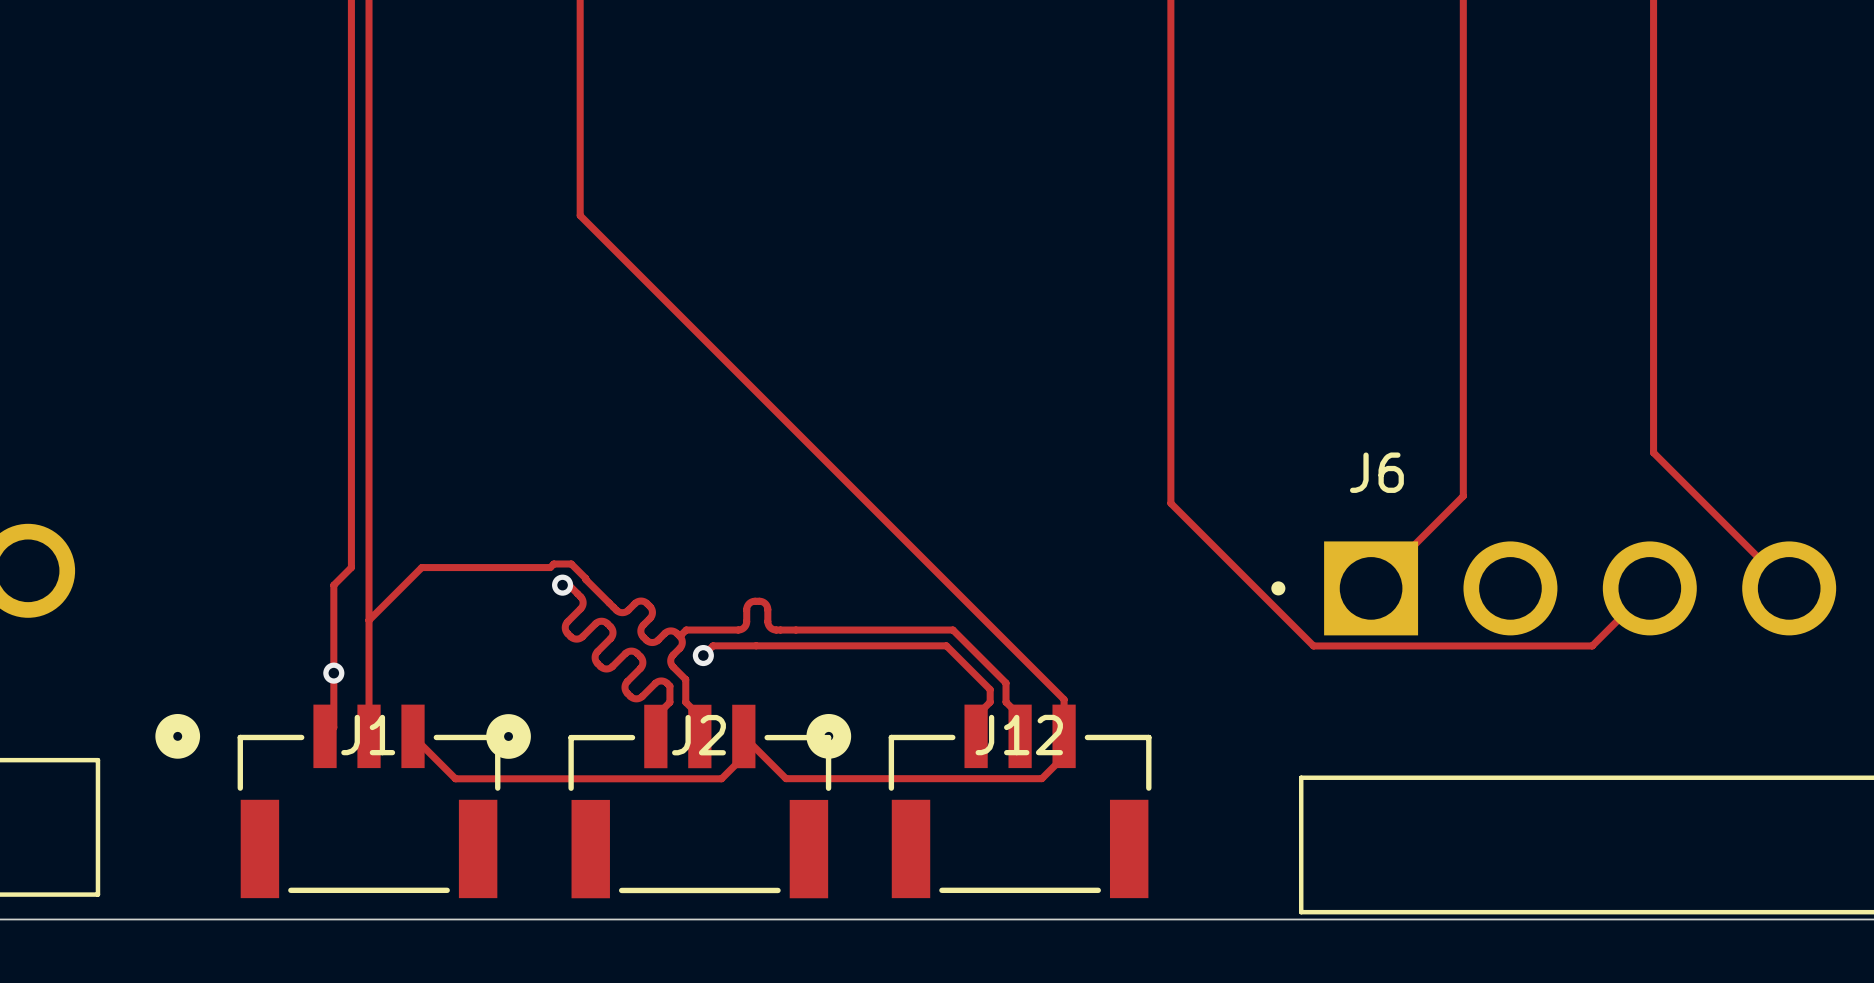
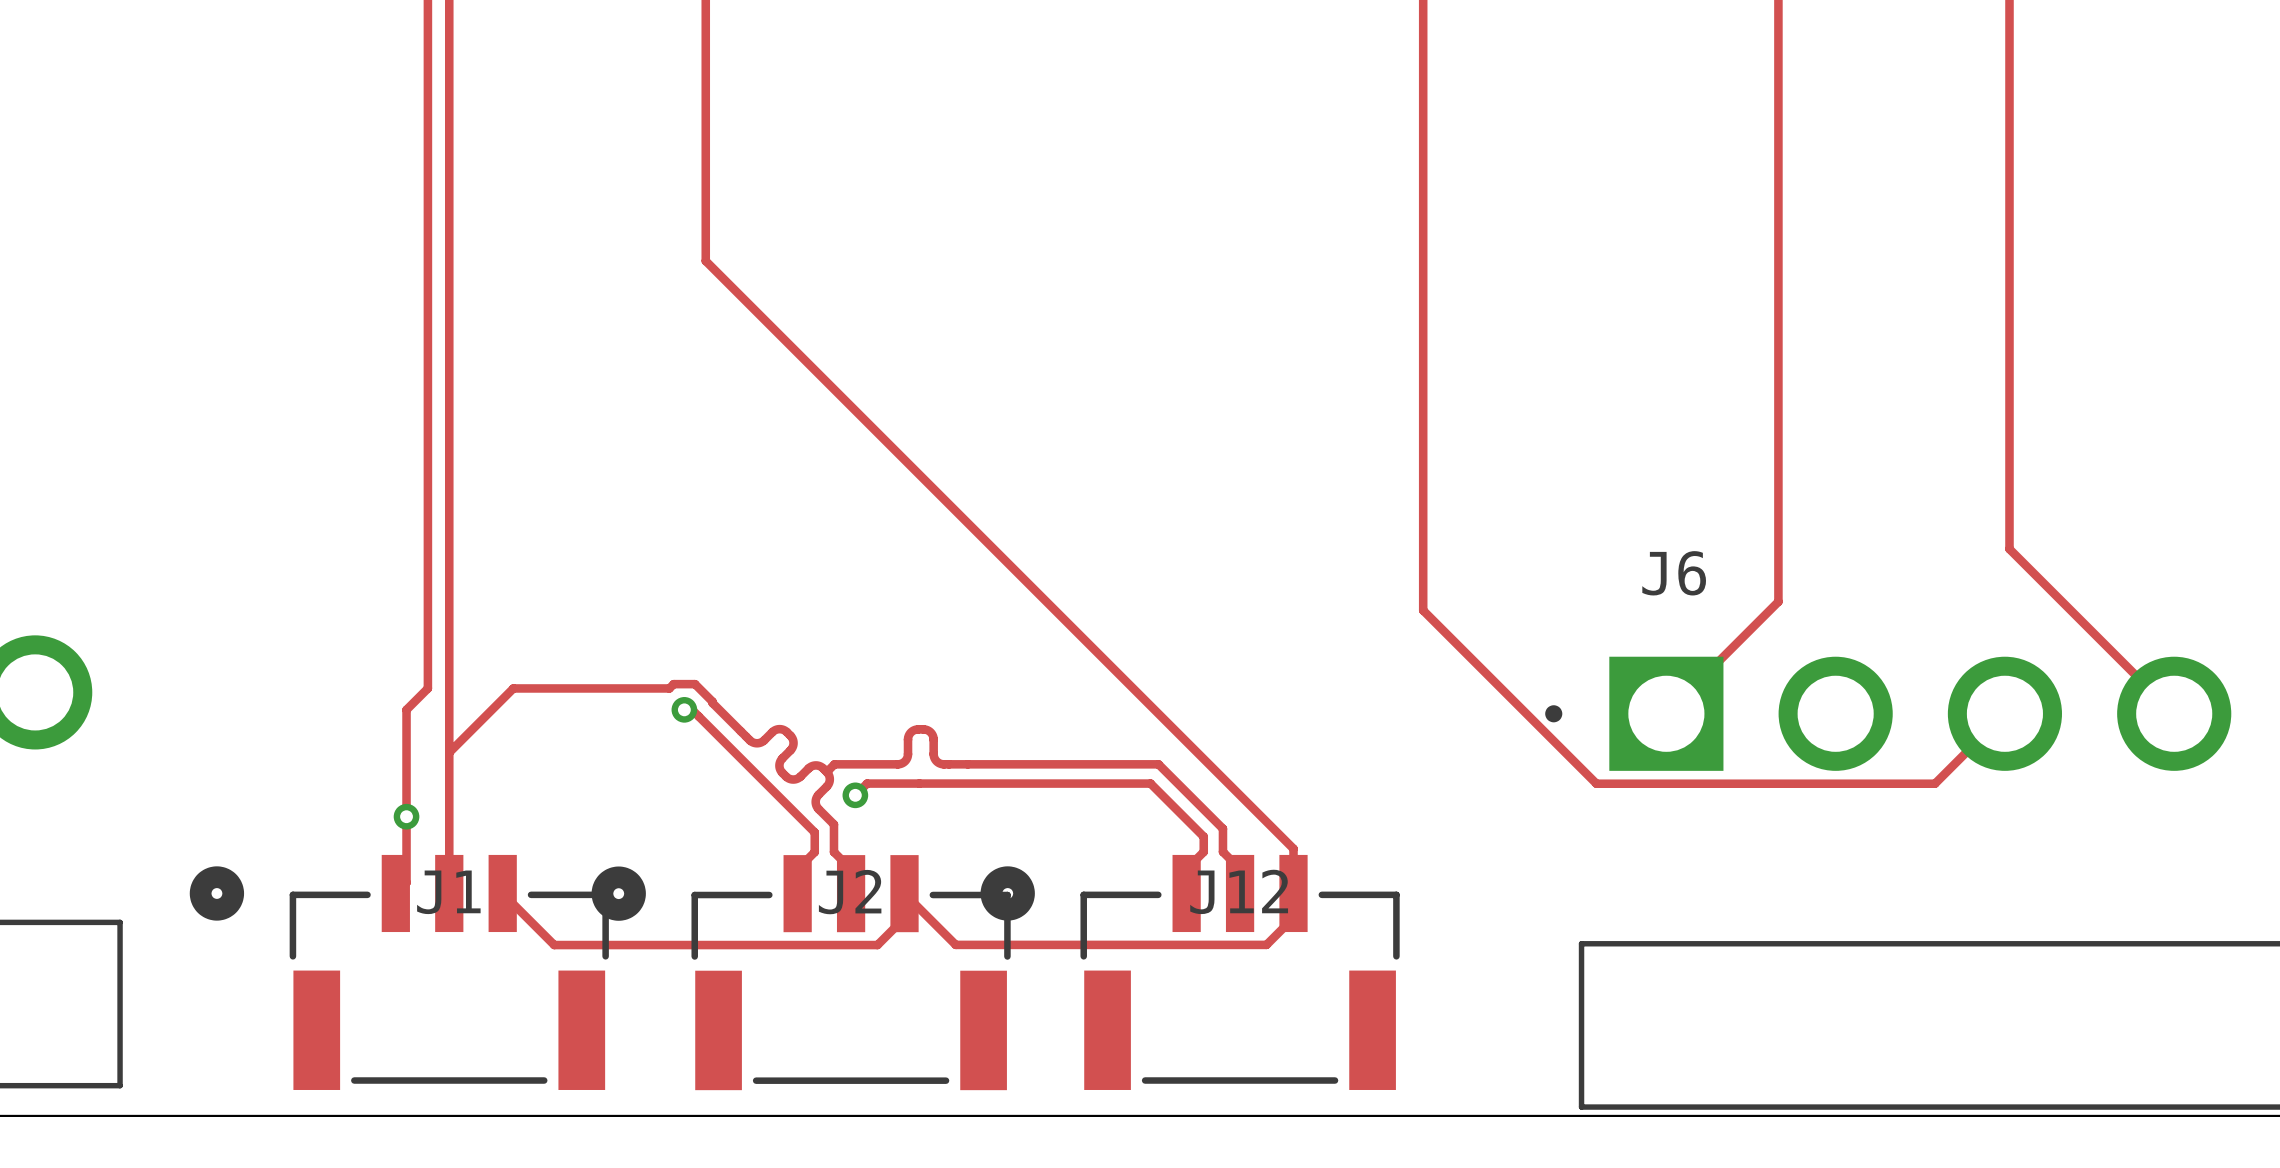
track: (580, 596) (582, 600) (582, 606) (565, 624) (567, 633) (573, 638) (578, 638) (597, 622) (603, 621) (607, 623) -> (706, 724) (738, 756)
track: (610, 626) (612, 630) (612, 636) (595, 655) (595, 661) (600, 666) (604, 668) (610, 668) (628, 651) (637, 653) -> (742, 760) (775, 792)
track: (640, 656) (642, 660) (642, 666) (625, 684) (627, 693) (632, 698) (638, 698) (657, 681) (663, 681) (667, 683) -> (778, 796) (811, 829)

